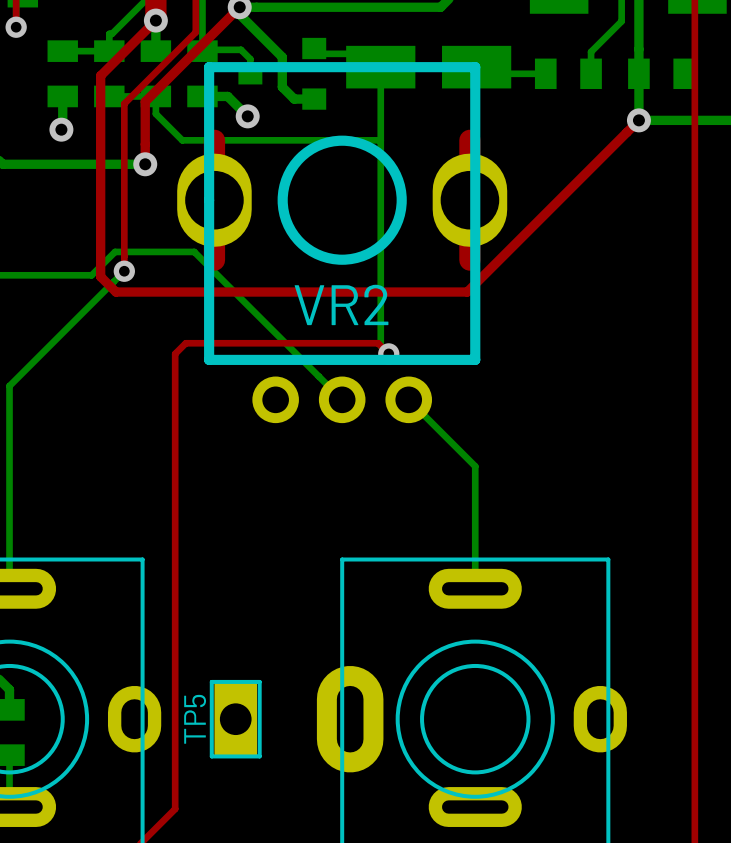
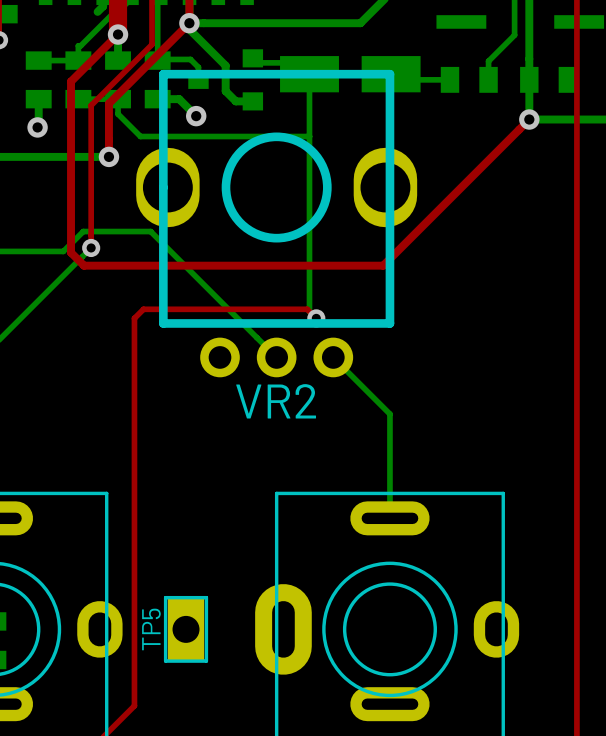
VR2 footprint: [177, 62, 508, 424] -> [136, 69, 418, 378]
VR2 name position: VR2 (341, 304) -> VR2 (276, 401)

